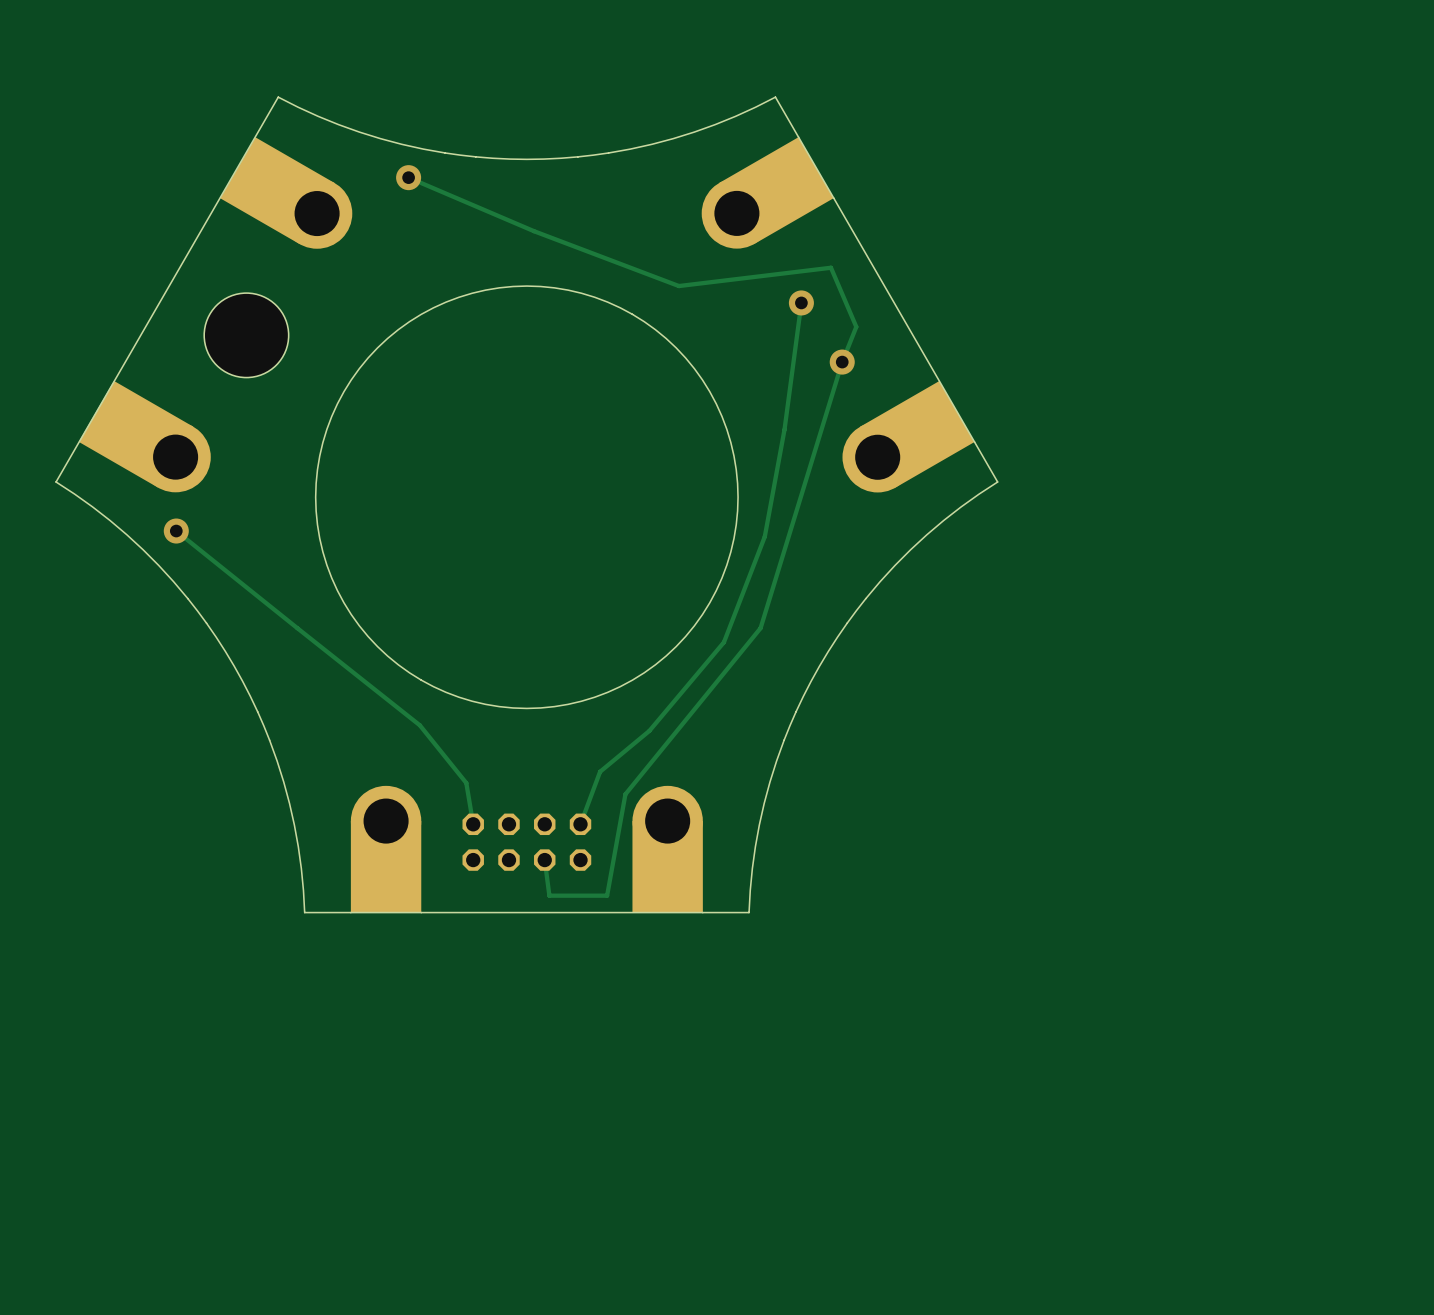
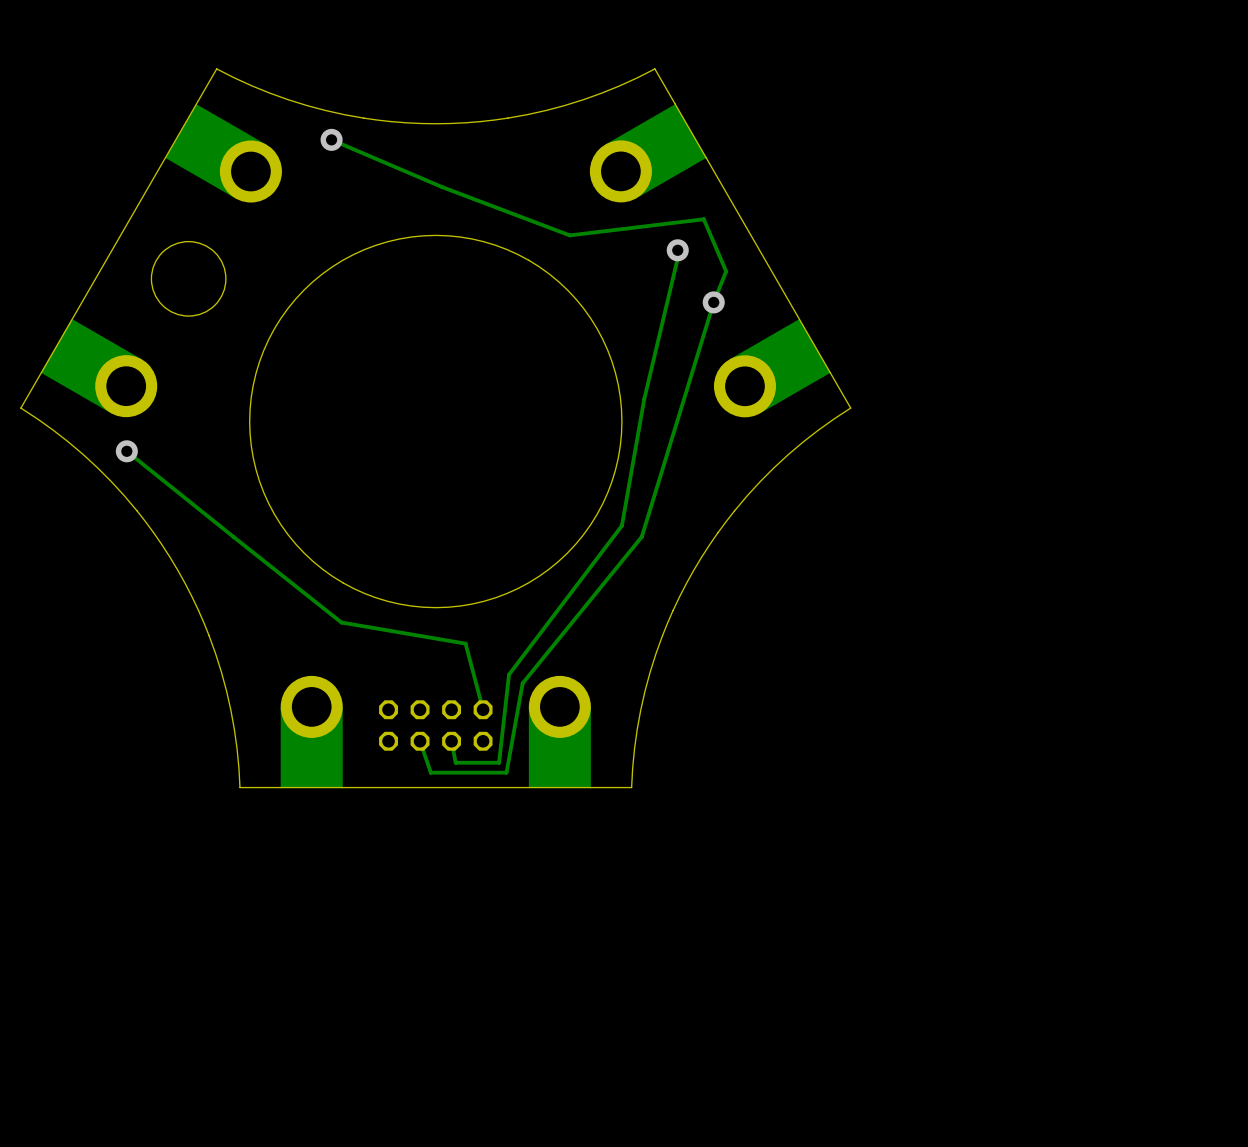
track: none -> (680, 247) (644, 399) (621, 525) (509, 674) (499, 762) (455, 762) (451, 741)
track: (801, 302) (784, 429) (764, 536) (723, 642) (649, 730) (600, 771) (580, 824) -> none
track: (419, 725) (466, 783) (473, 824) -> (341, 622) (465, 643) (483, 709)
track: (544, 860) (549, 895) -> (420, 741) (430, 772) (455, 772)

